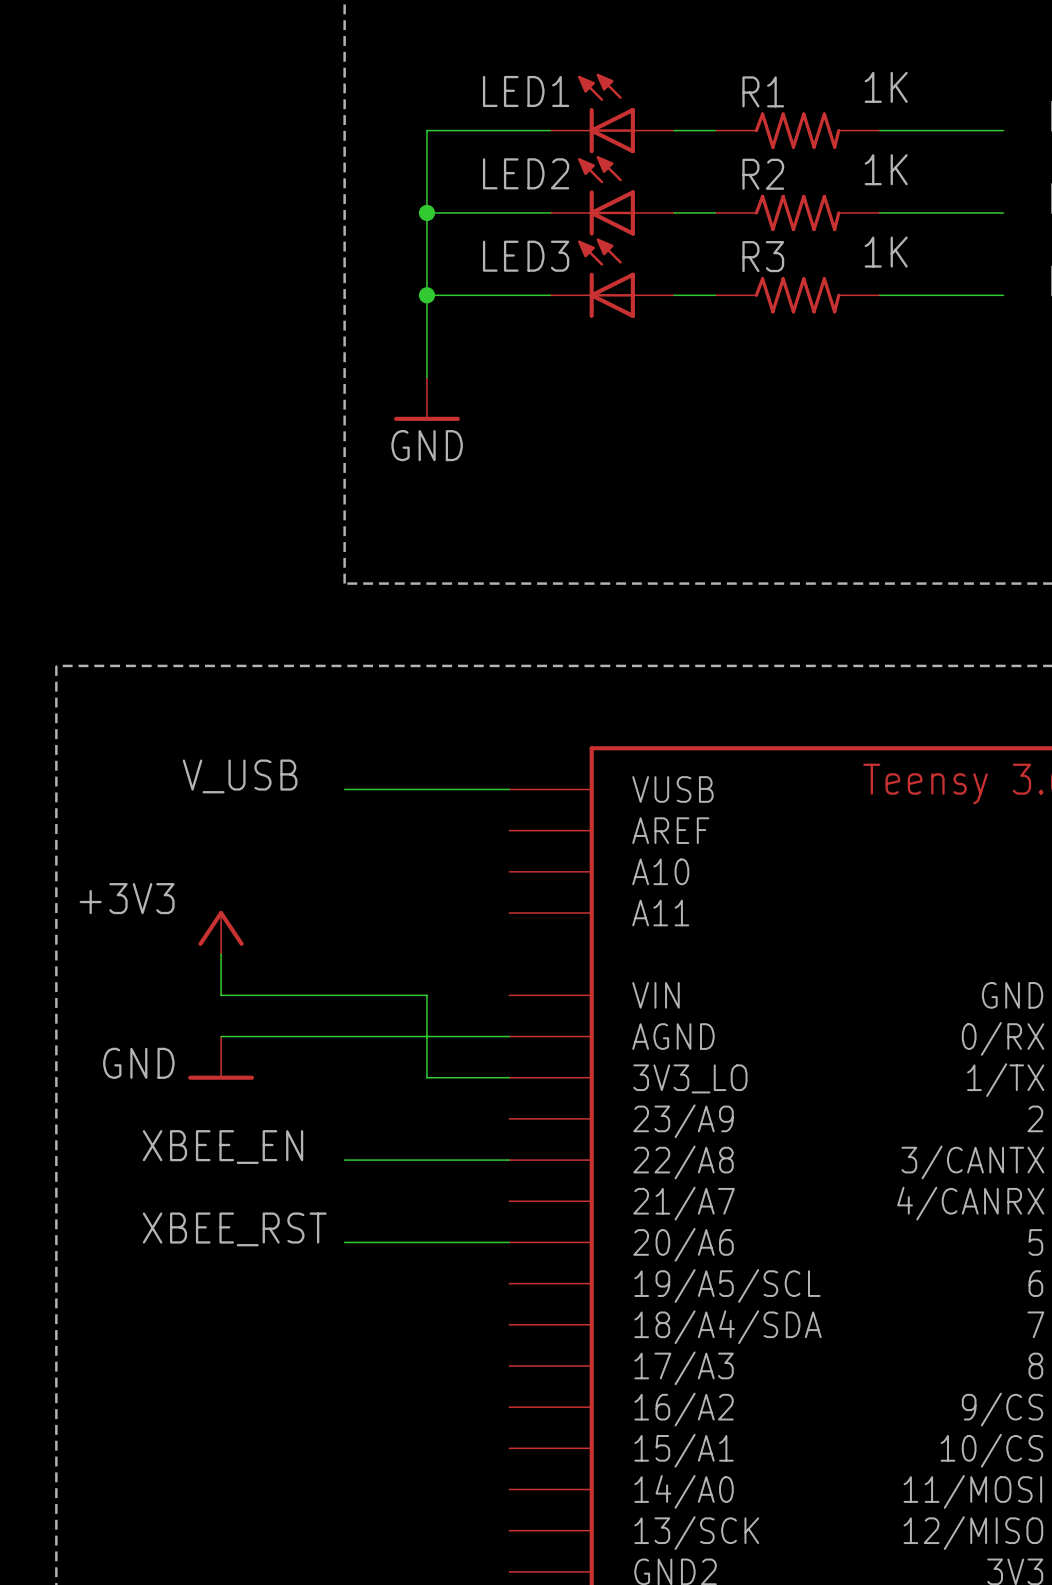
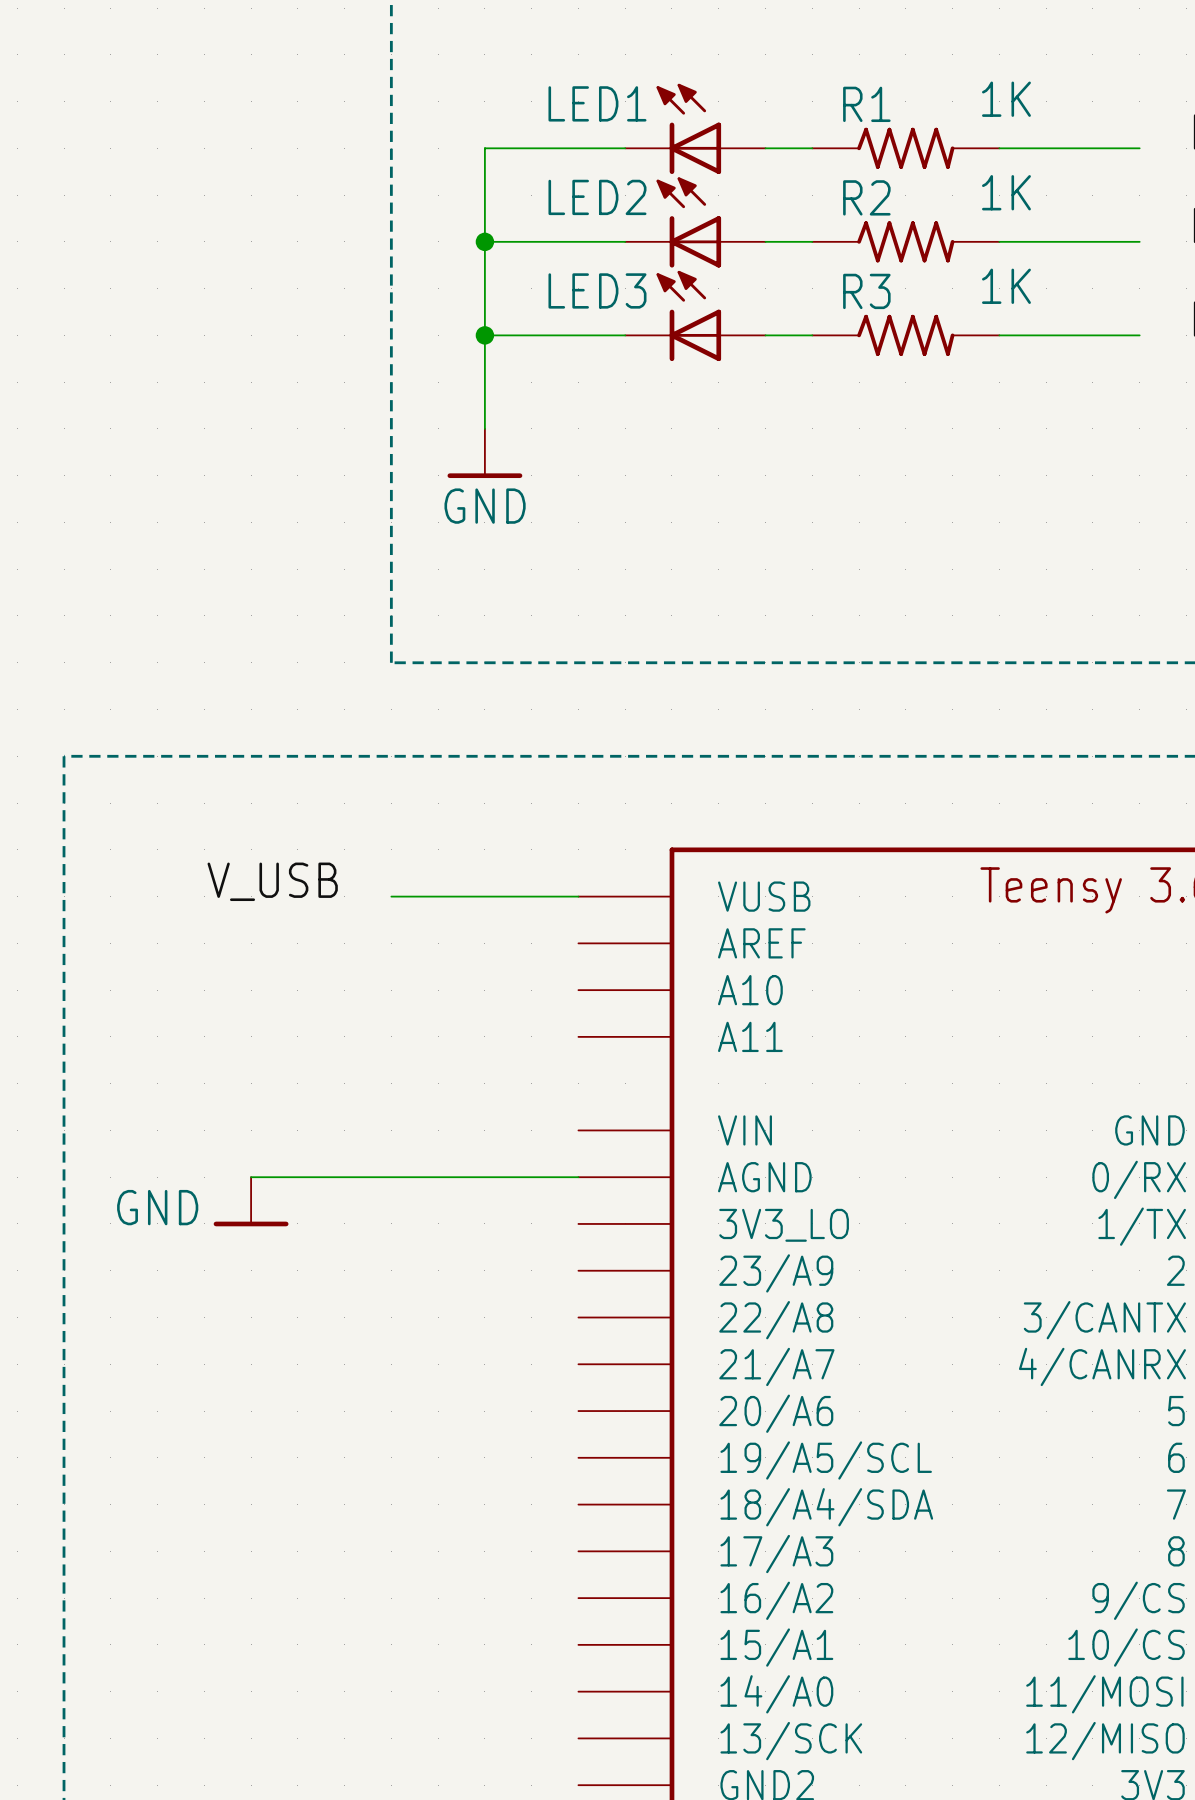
power symbol: +3V3 (221, 932) -> none
wire: (221, 954) (221, 995) (426, 995) (426, 1077) (509, 1077) -> none
label: XBEE_EN (223, 1147) -> none
wire: (344, 1160) (509, 1160) -> none
label: XBEE_RST (234, 1229) -> none
wire: (344, 1242) (509, 1242) -> none

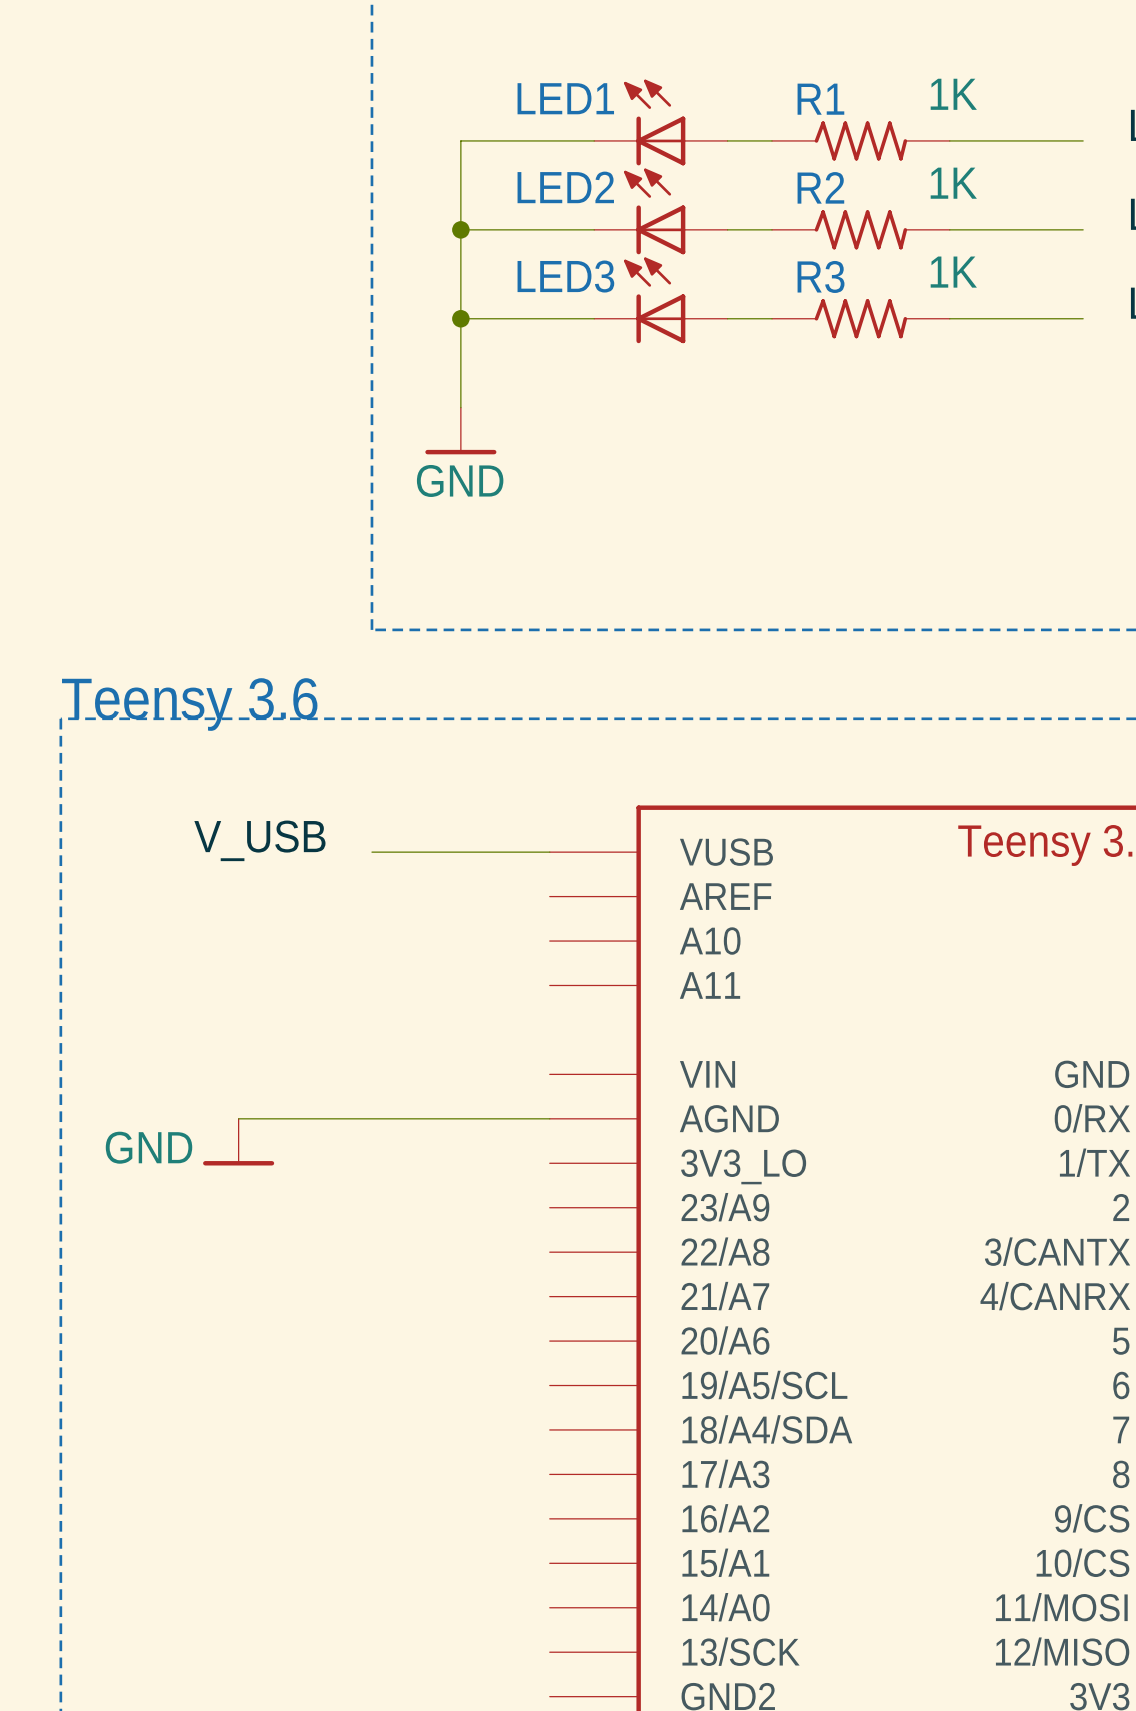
text: none -> Teensy 3.6 (189, 704)

